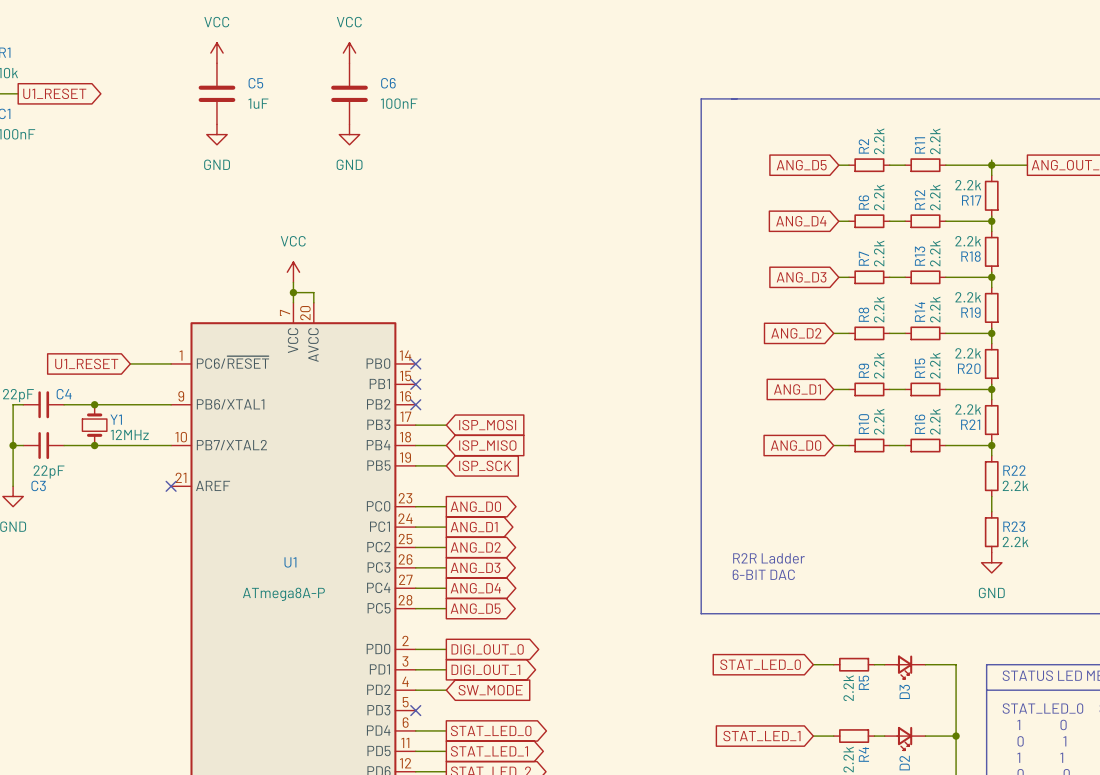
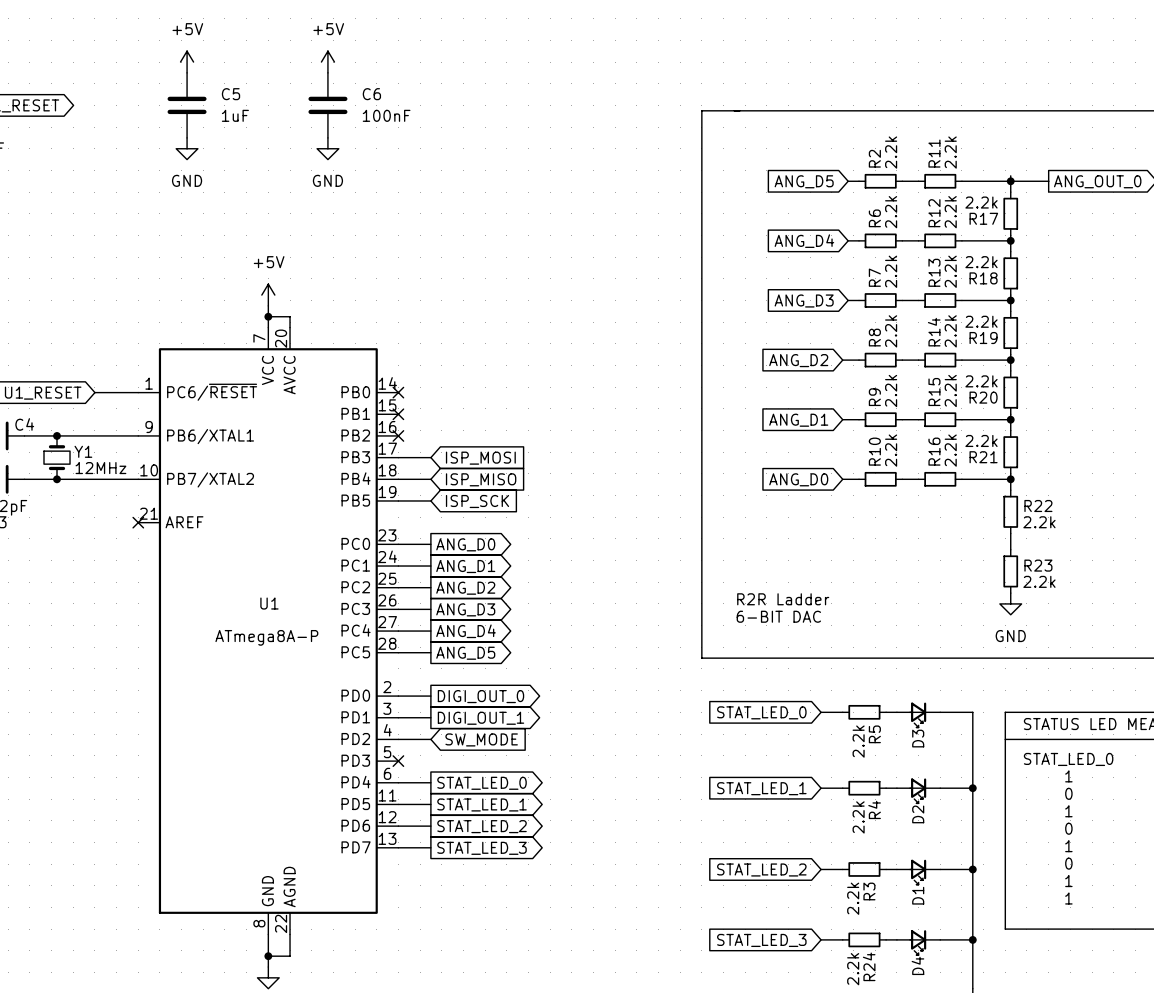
power symbol: VCC (216, 53) -> +5V (187, 62)
power symbol: VCC (349, 53) -> +5V (327, 62)
power symbol: VCC (293, 272) -> +5V (268, 295)

